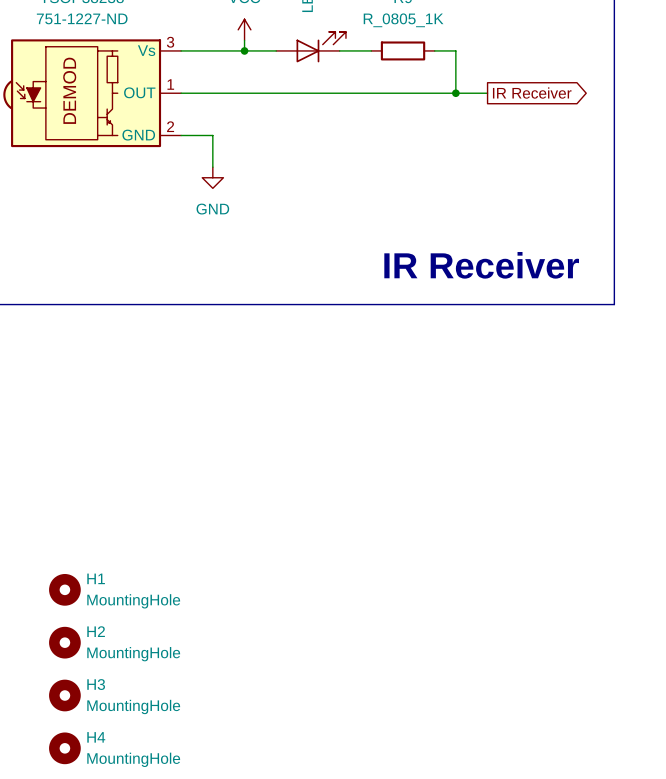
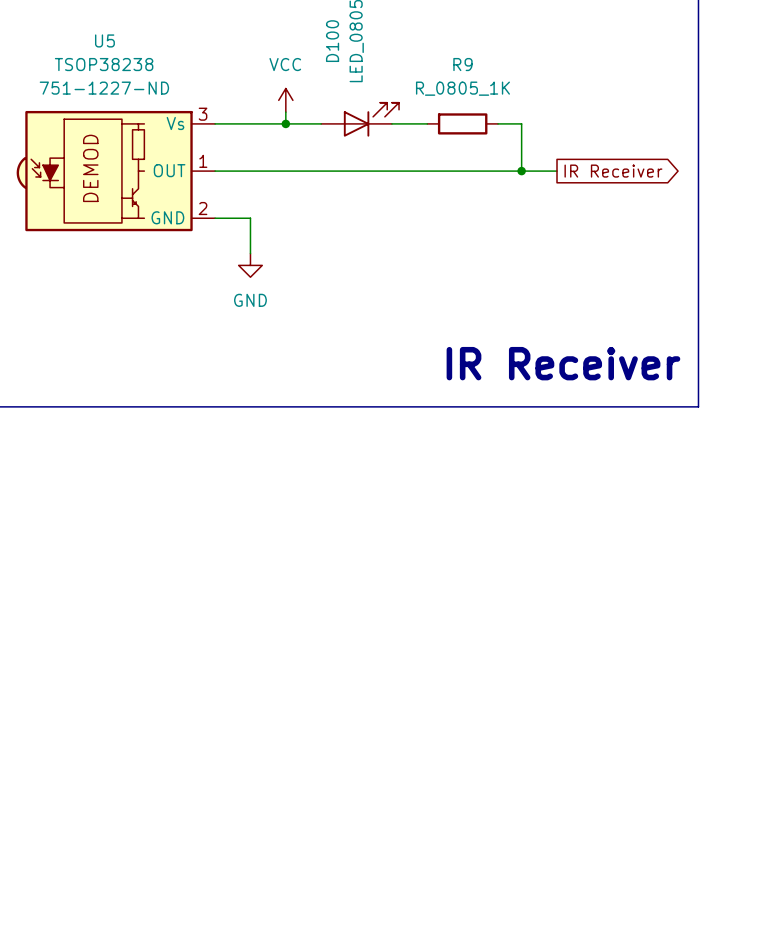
H1: MountingHole (64, 589) -> none
H2: MountingHole (64, 642) -> none
H3: MountingHole (64, 695) -> none
H4: MountingHole (64, 748) -> none

